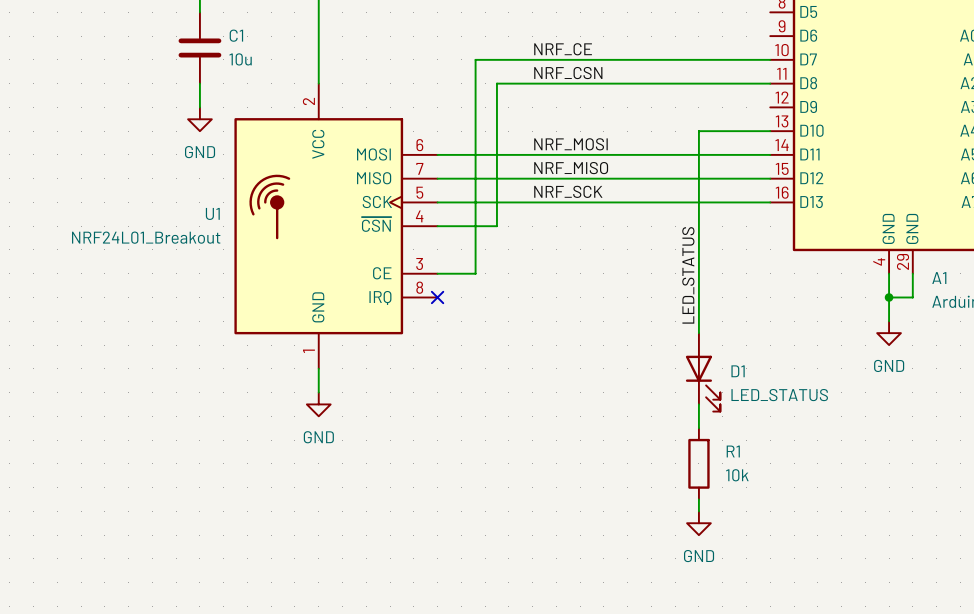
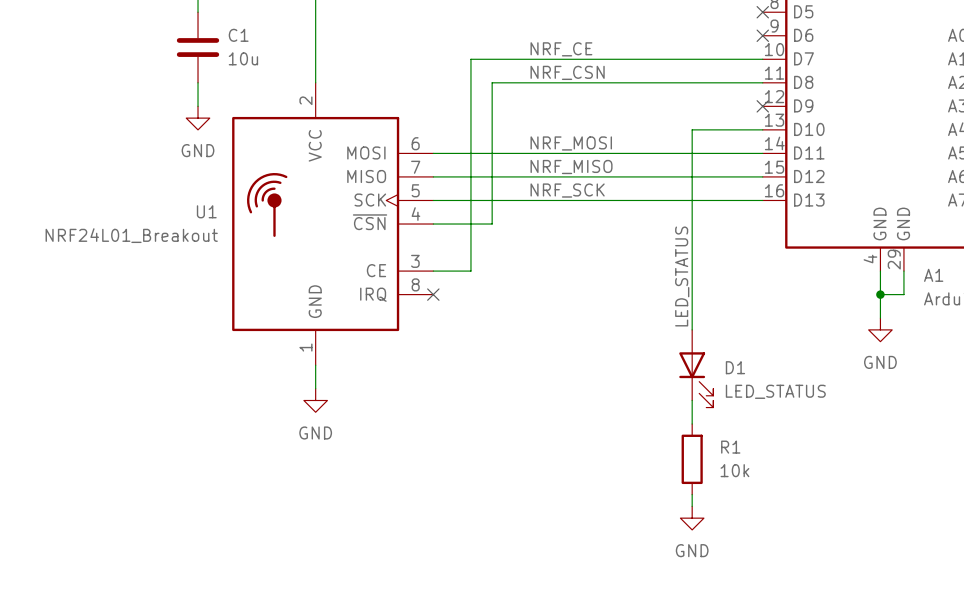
no-connect mark: none -> (762, 12)
no-connect mark: none -> (762, 35)
no-connect mark: none -> (762, 106)

